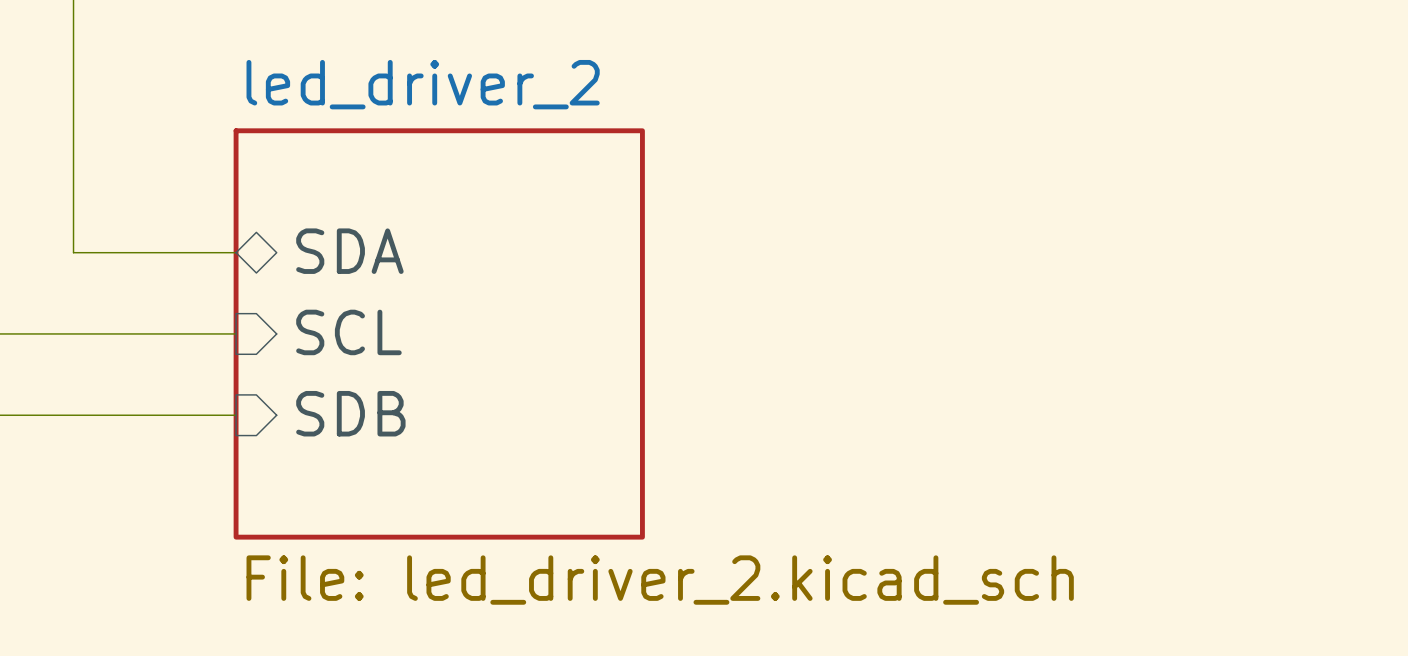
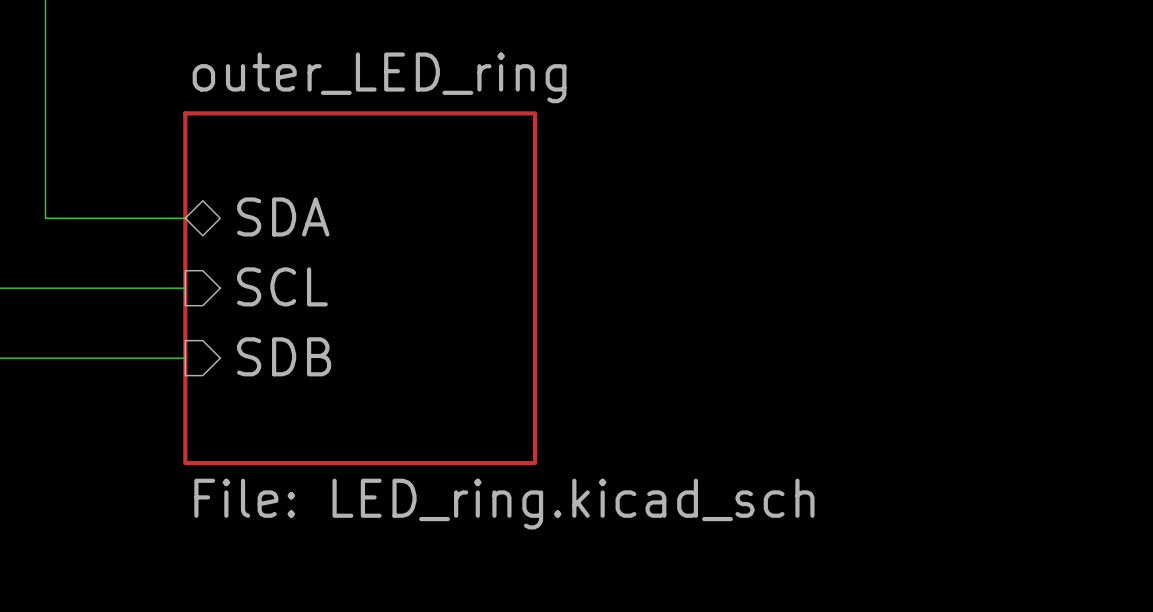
sheet led_driver_2 name: led_driver_2 (423, 84) -> outer_LED_ring (379, 77)
sheet led_driver_2 value: File: led_driver_2.kicad_sch (660, 580) -> File: LED_ring.kicad_sch (504, 504)

